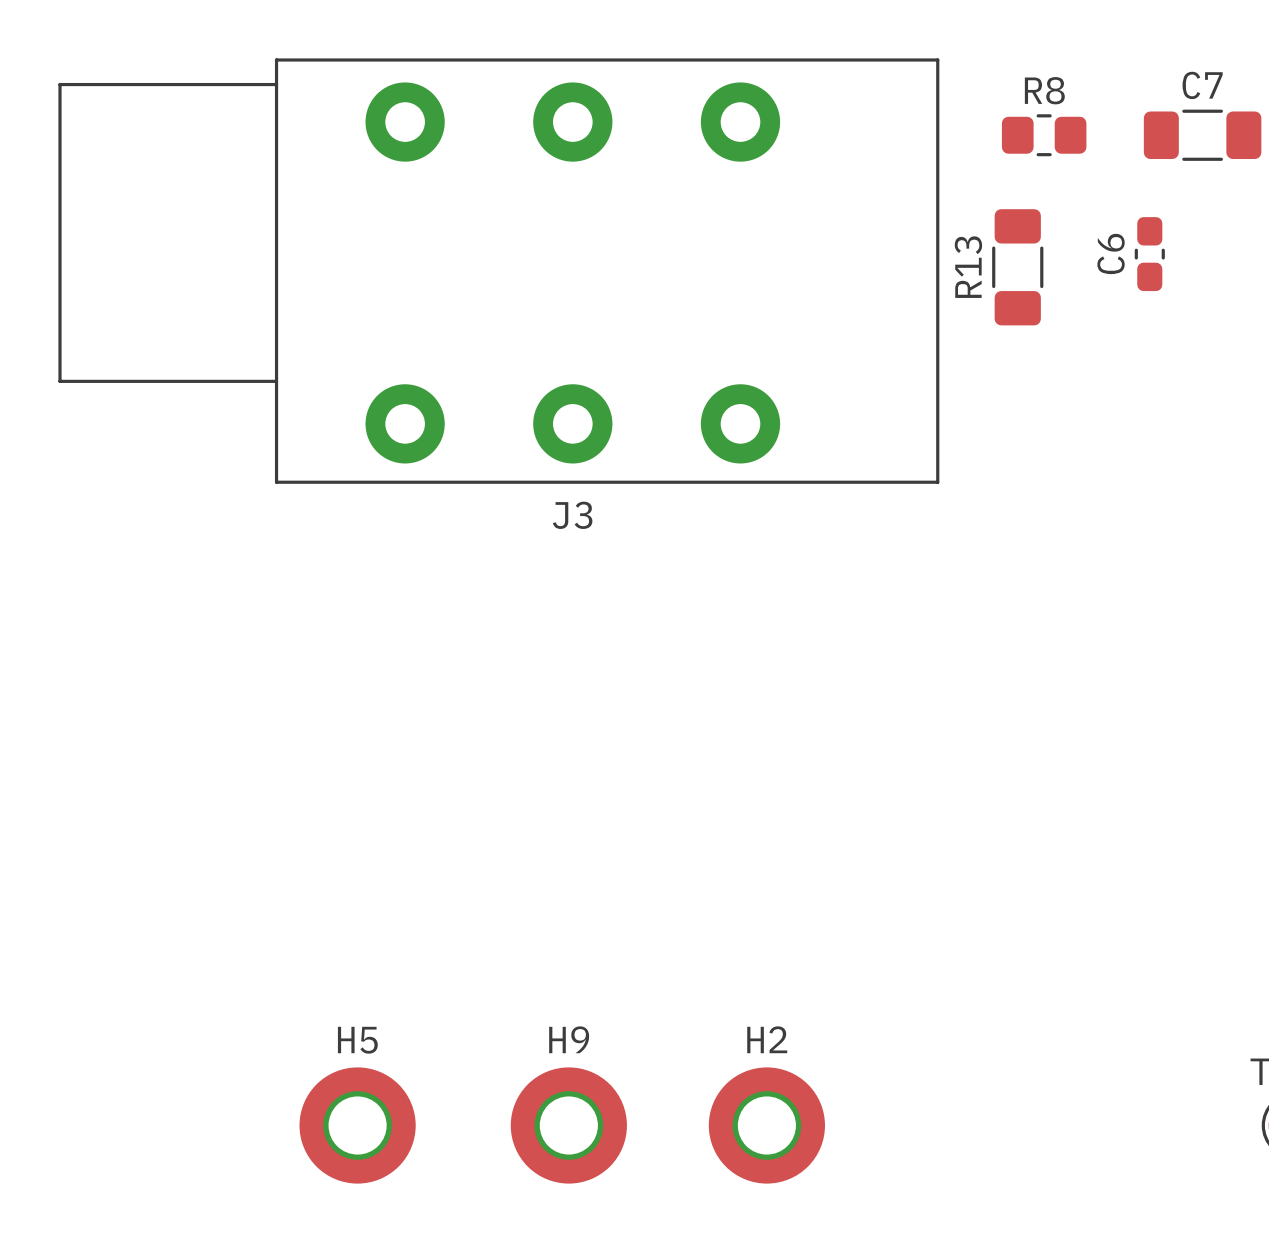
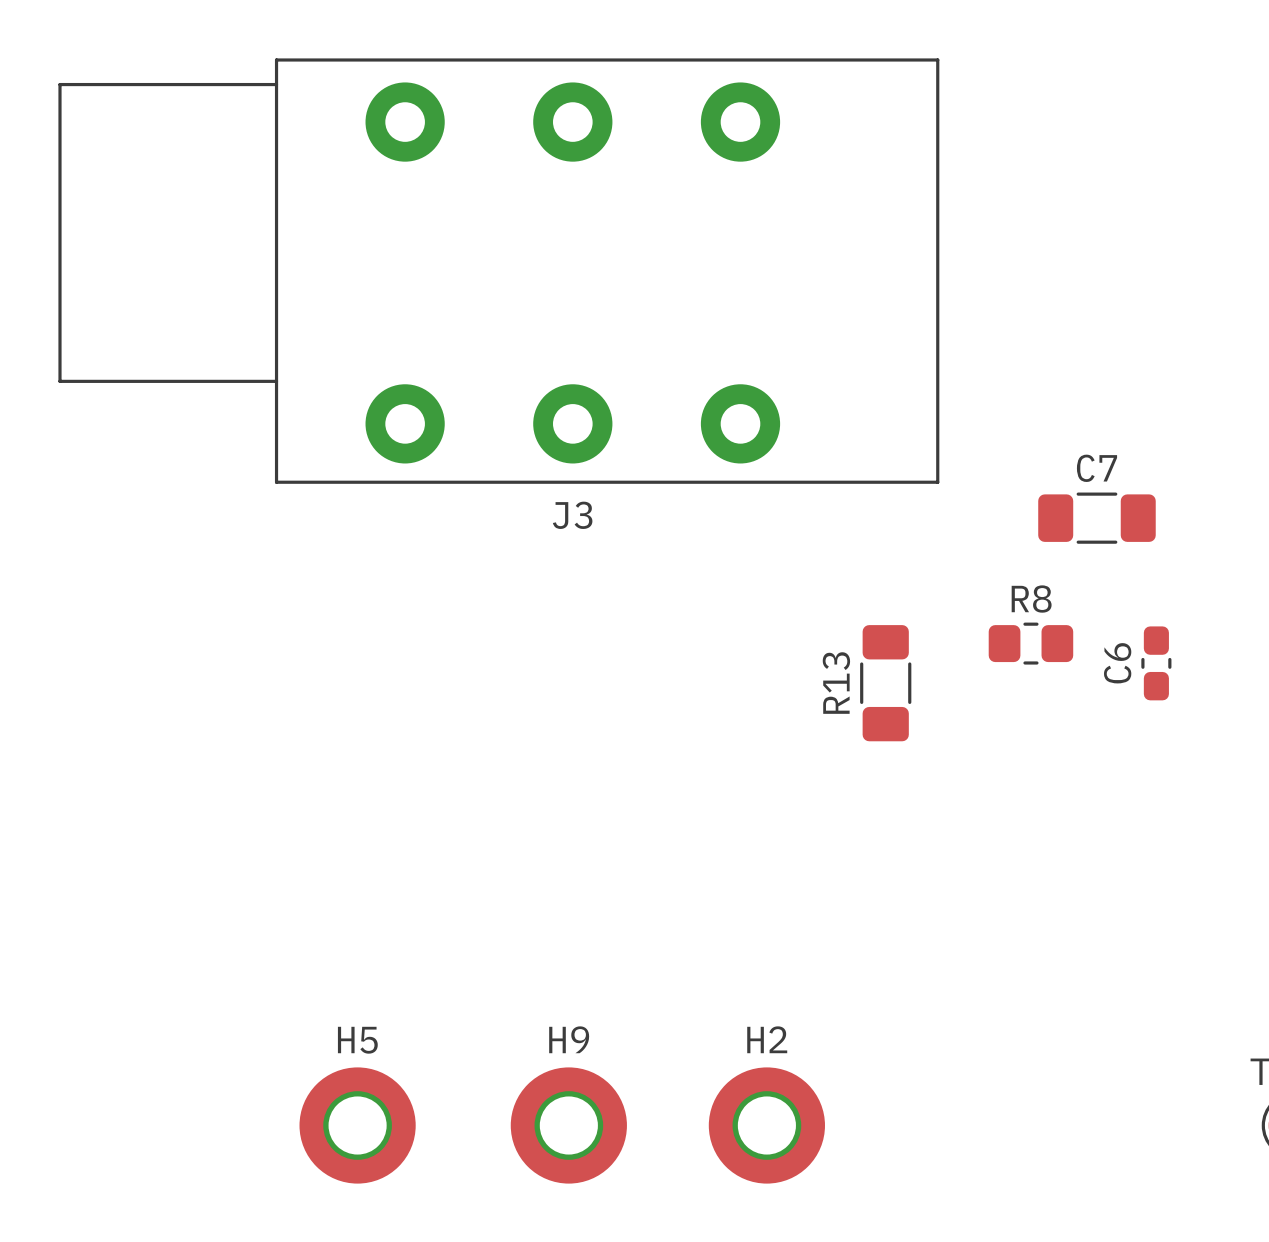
R8 position: (1044, 135) -> (1030, 643)
C7 position: (1202, 135) -> (1096, 518)
C6 position: (1149, 254) -> (1156, 663)
R13 position: (1017, 267) -> (885, 683)

